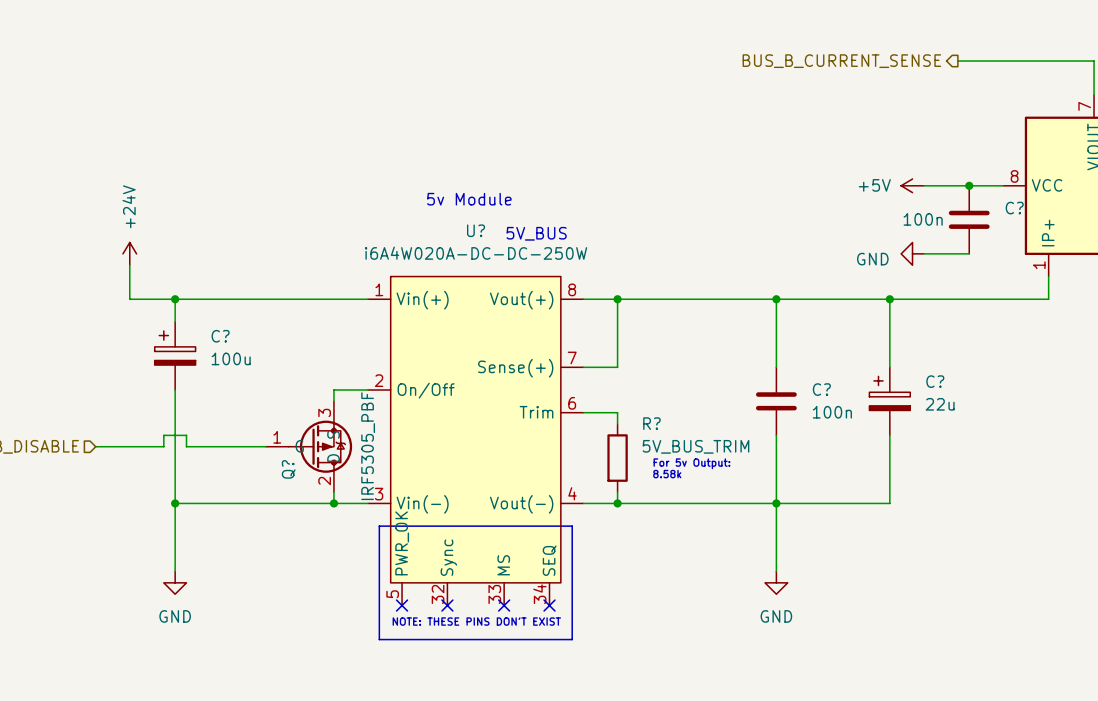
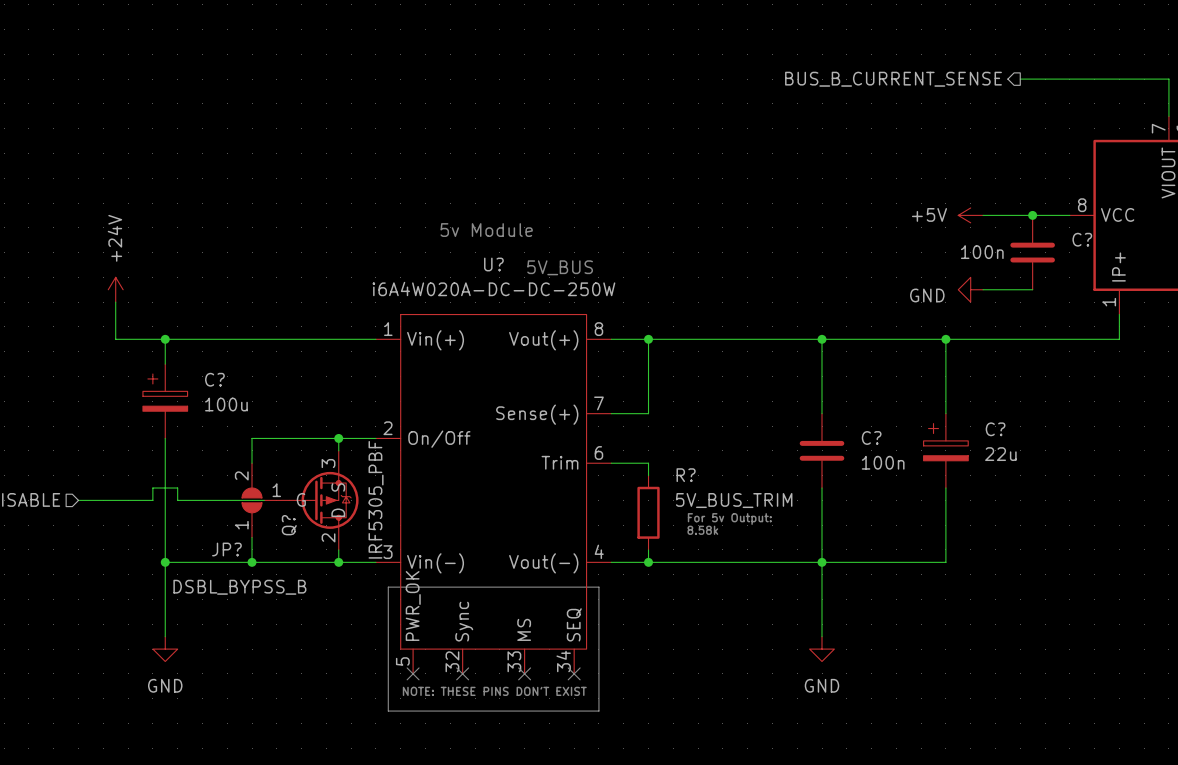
wire: none -> (338, 438) (252, 438) (252, 463)
junction: none -> (338, 438)
JP?: none -> DSBL_BYPSS_B (252, 500)
wire: none -> (252, 537) (252, 562)
junction: none -> (252, 562)

